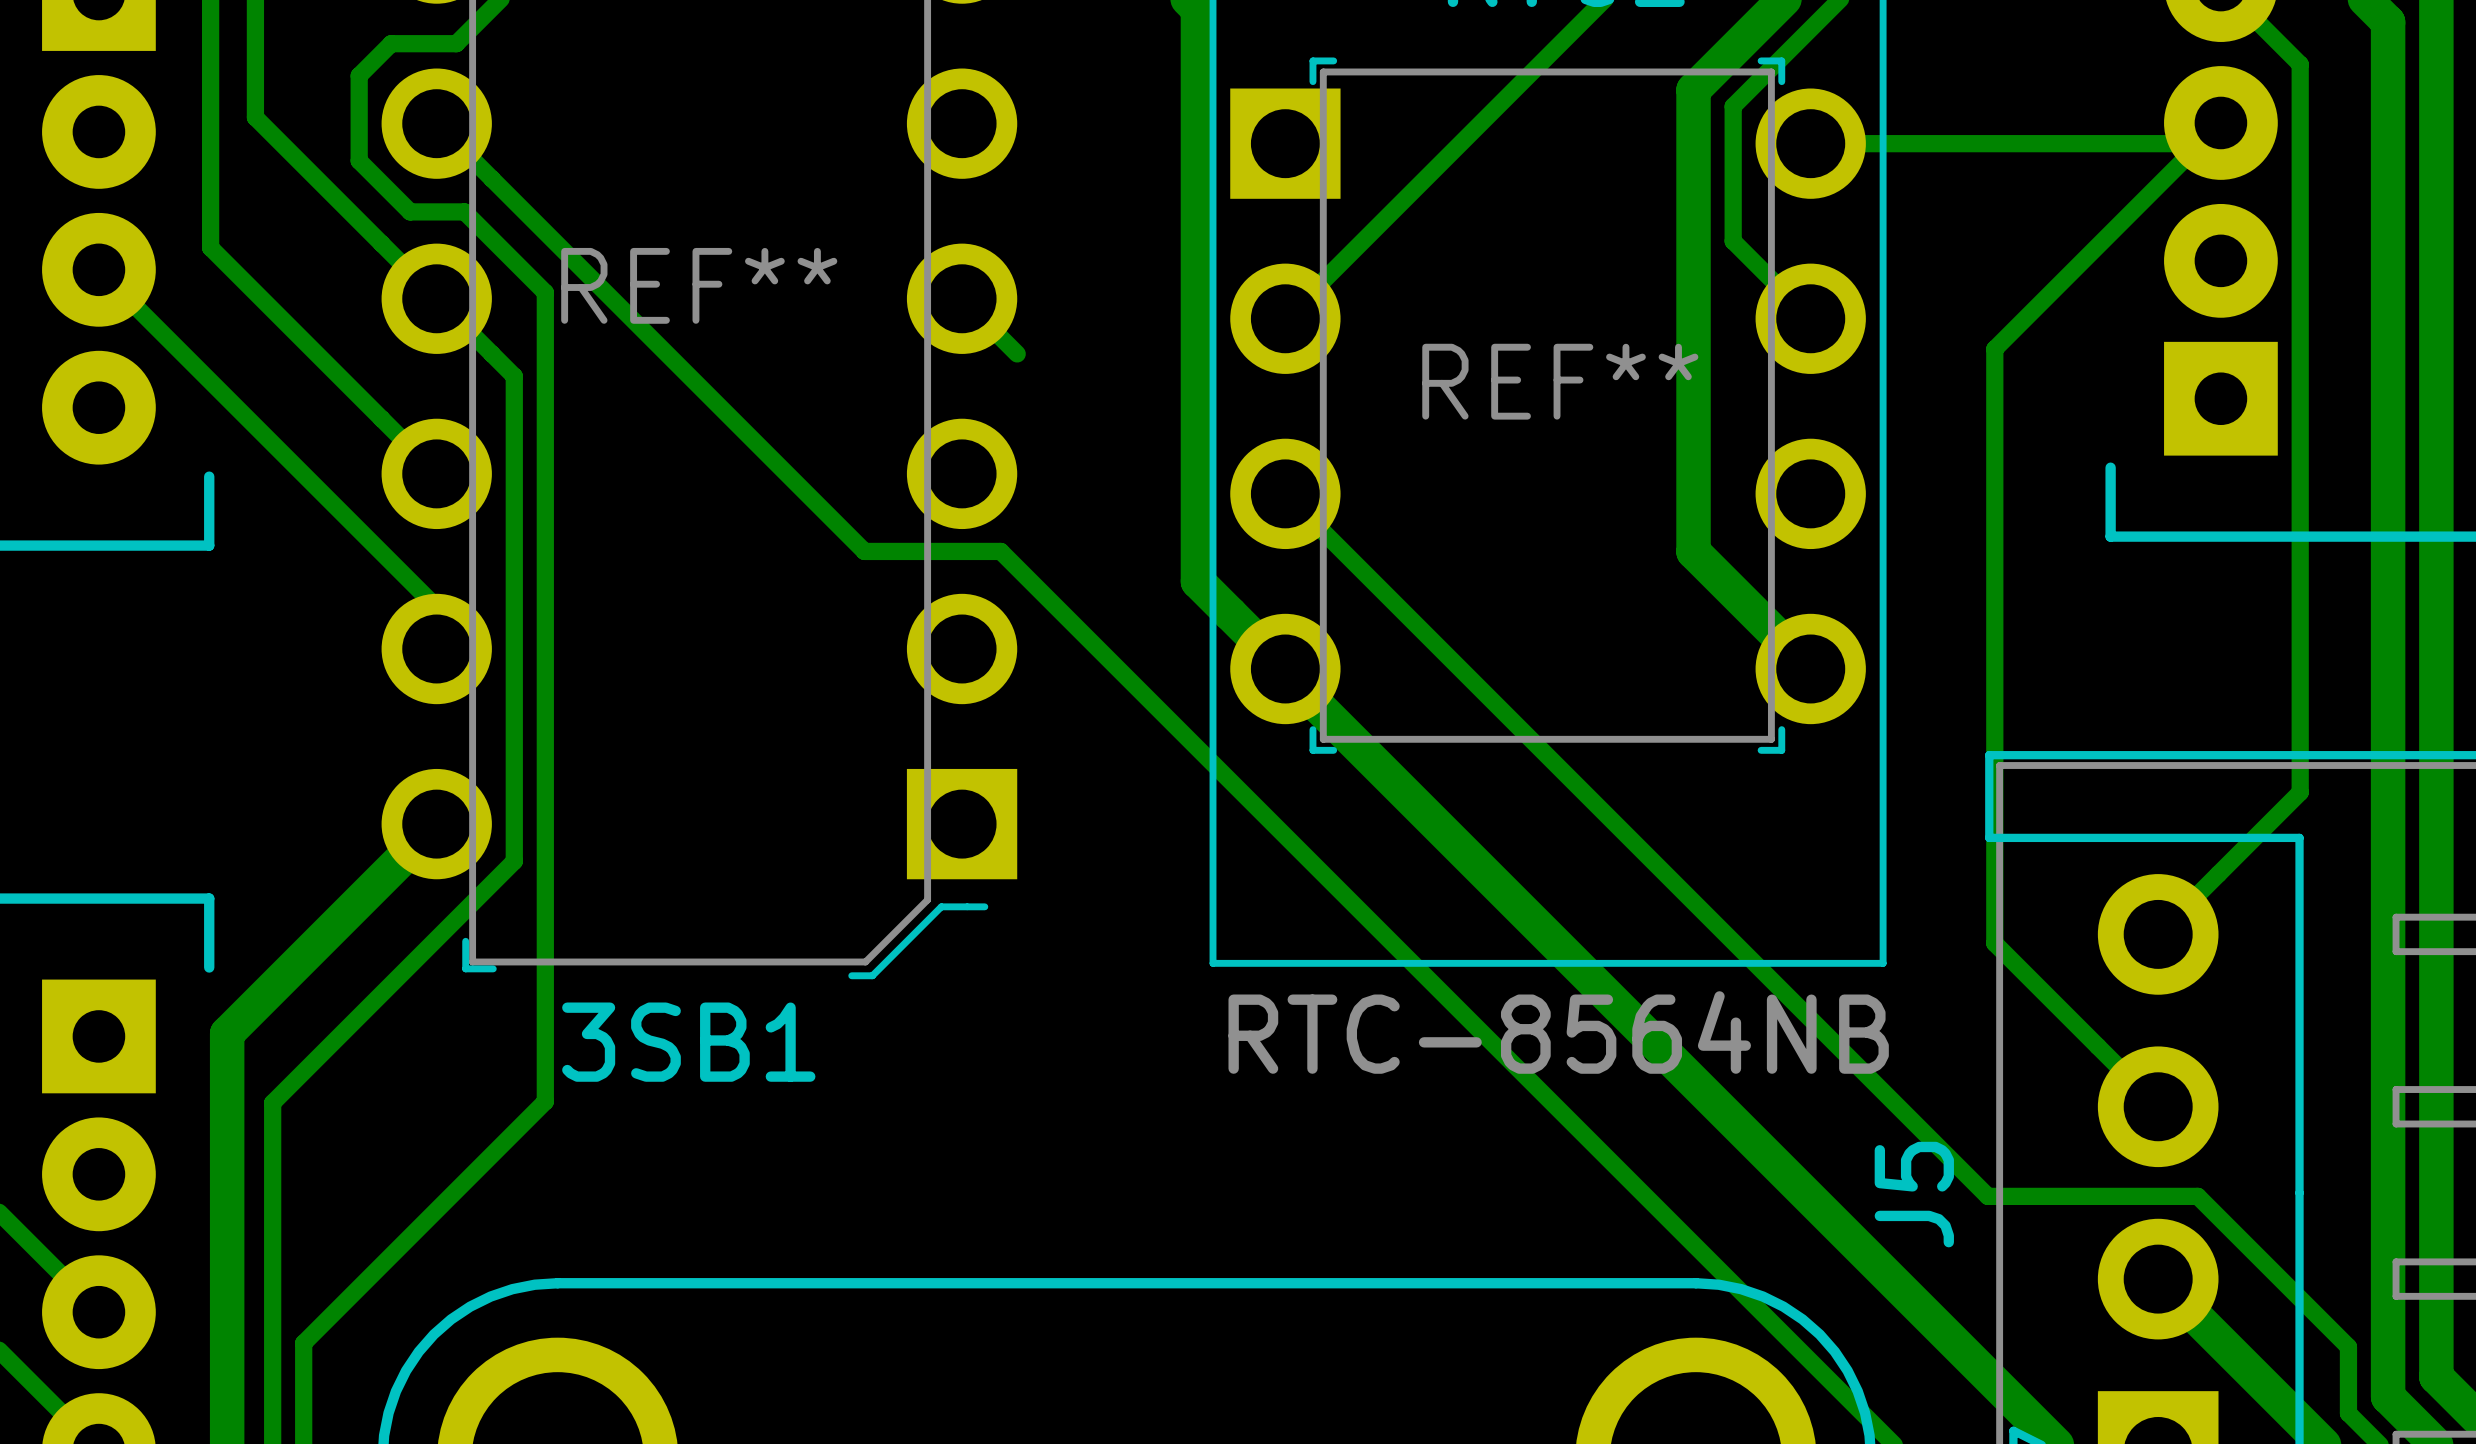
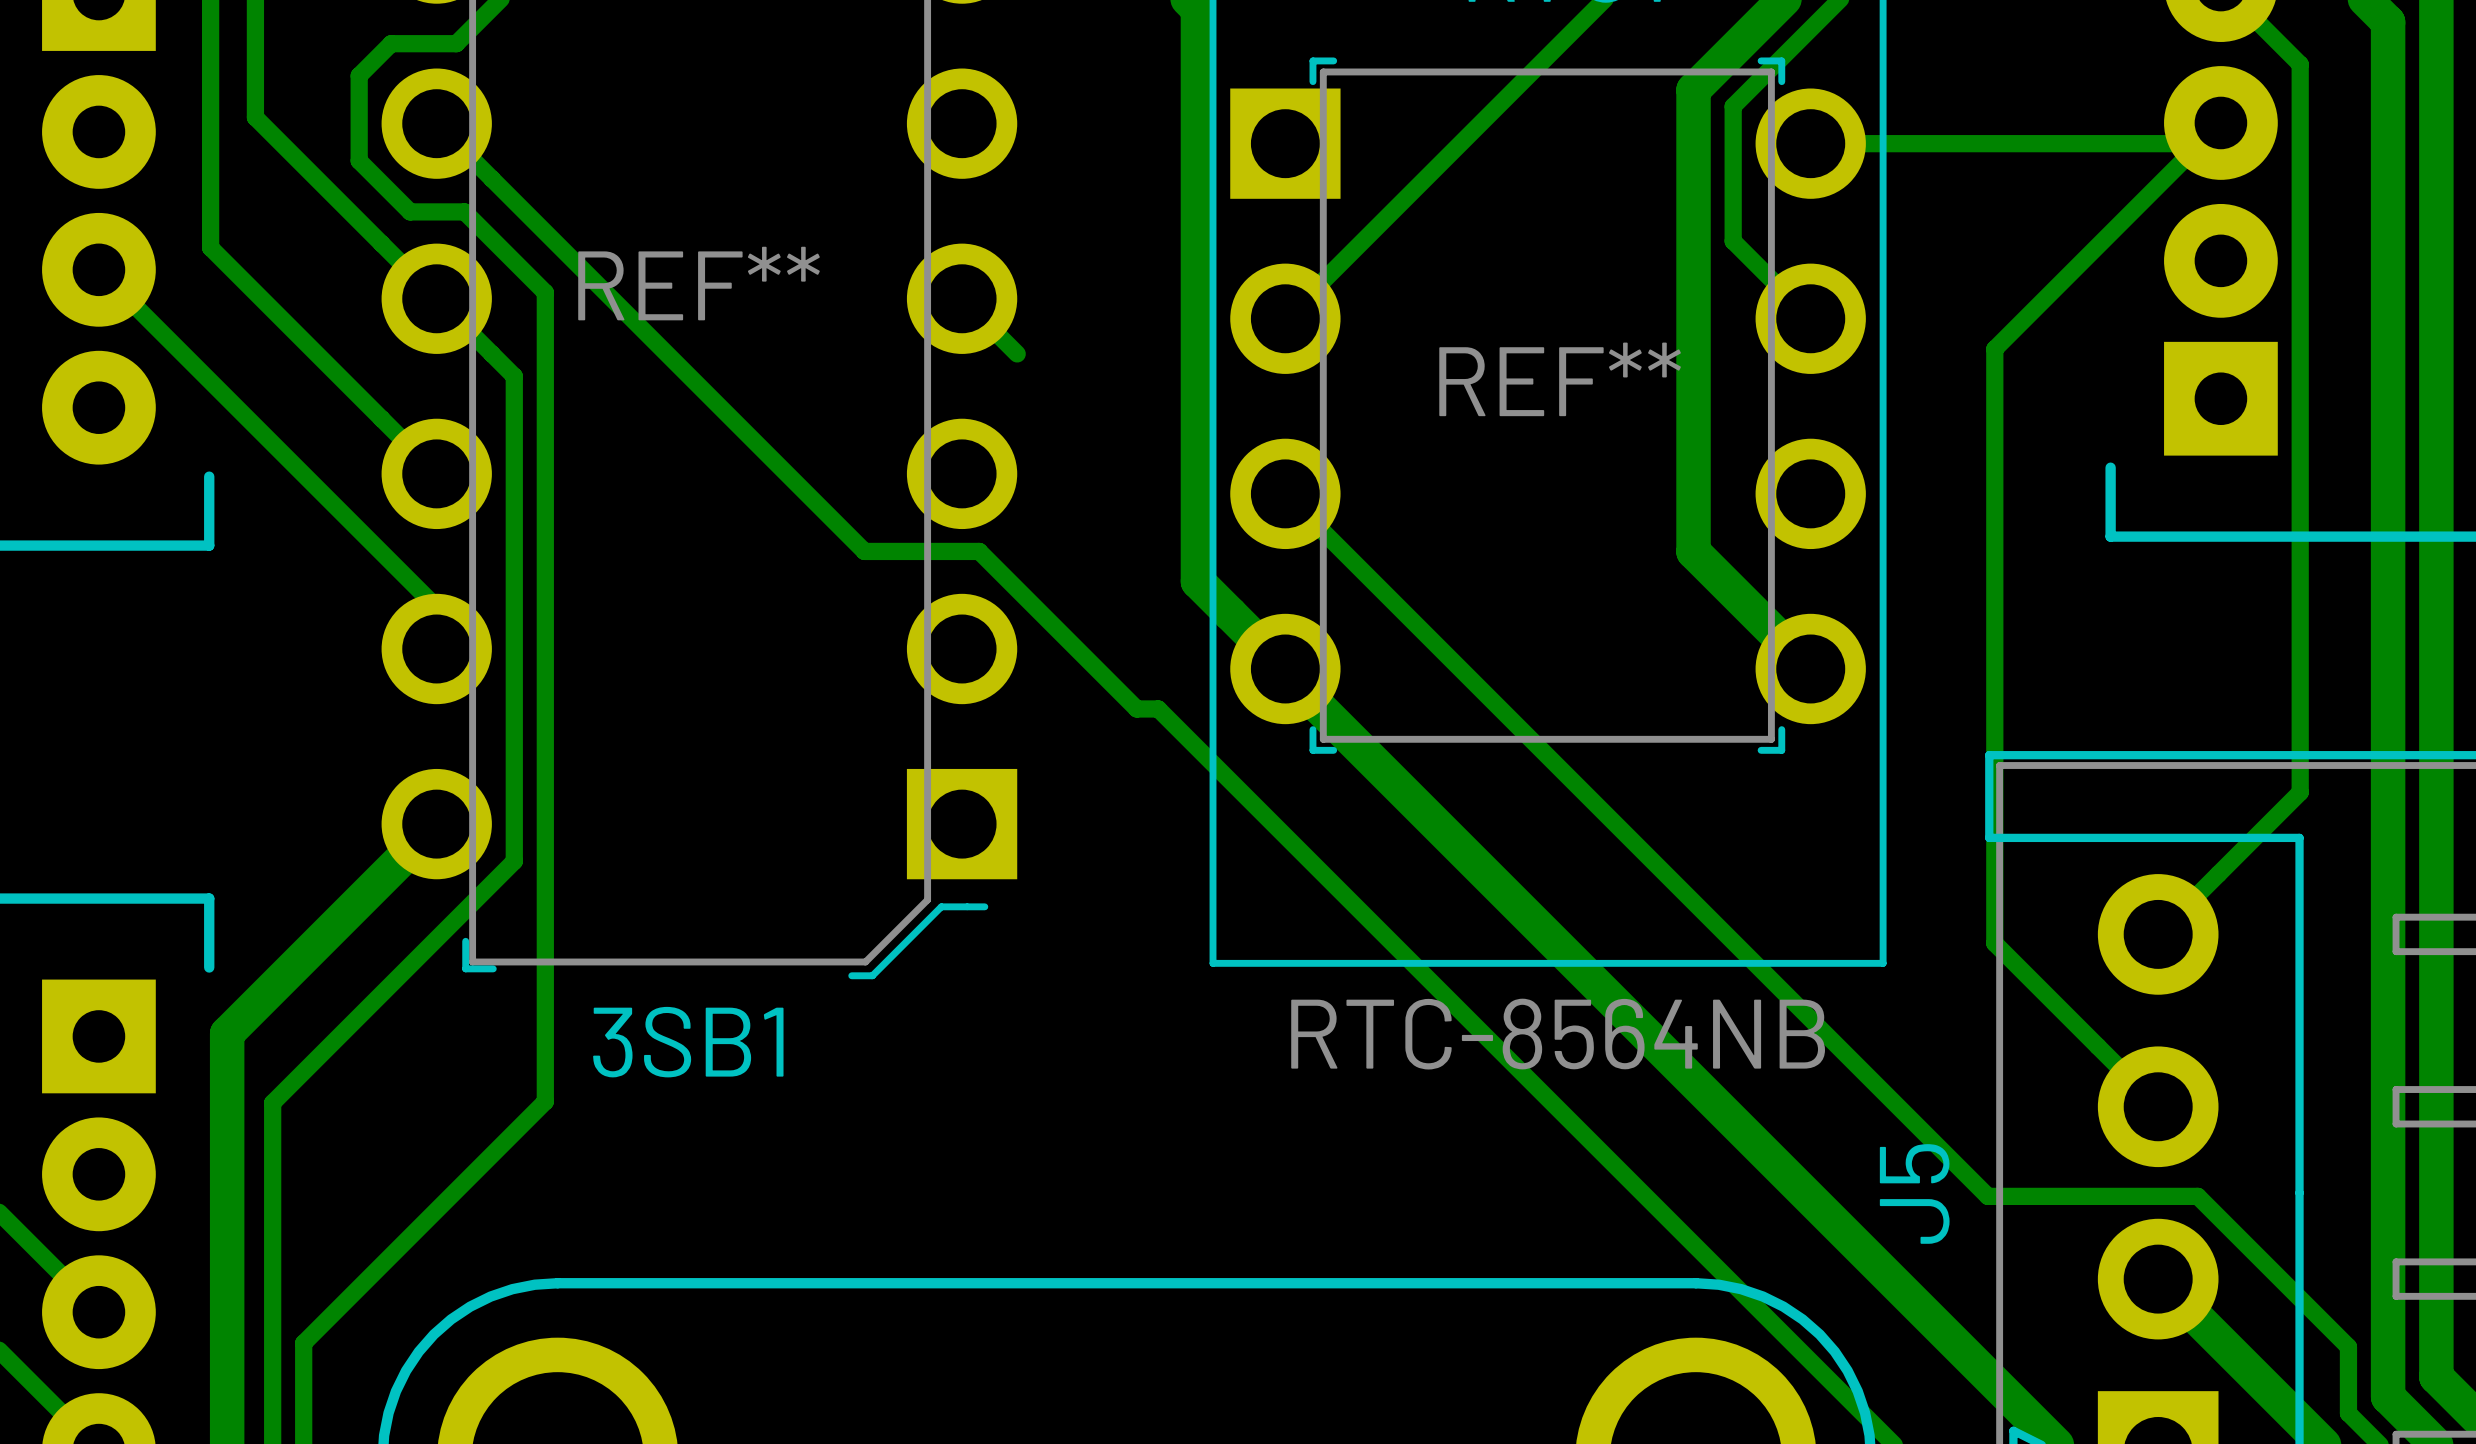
bottom track: (979, 551) (1000, 551) (1158, 708) -> (979, 551) (1136, 708) (1158, 708)

